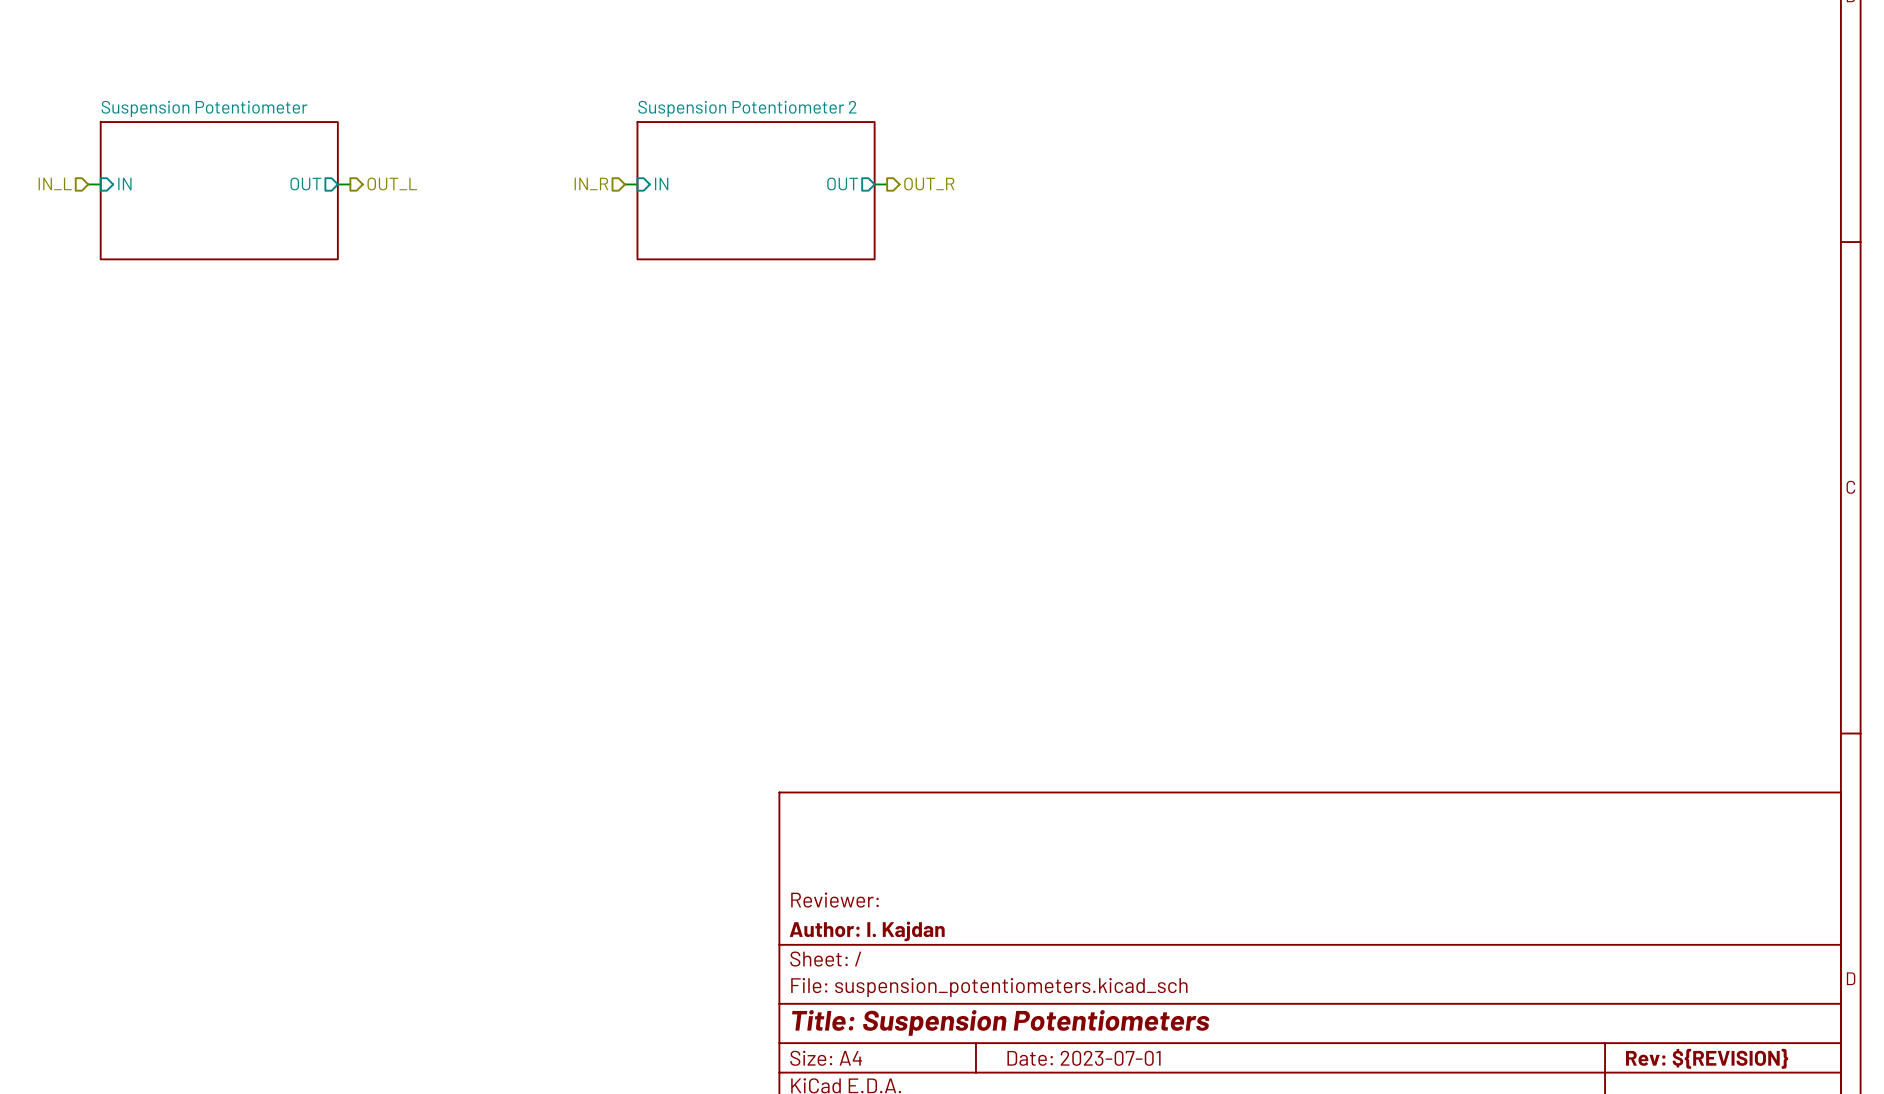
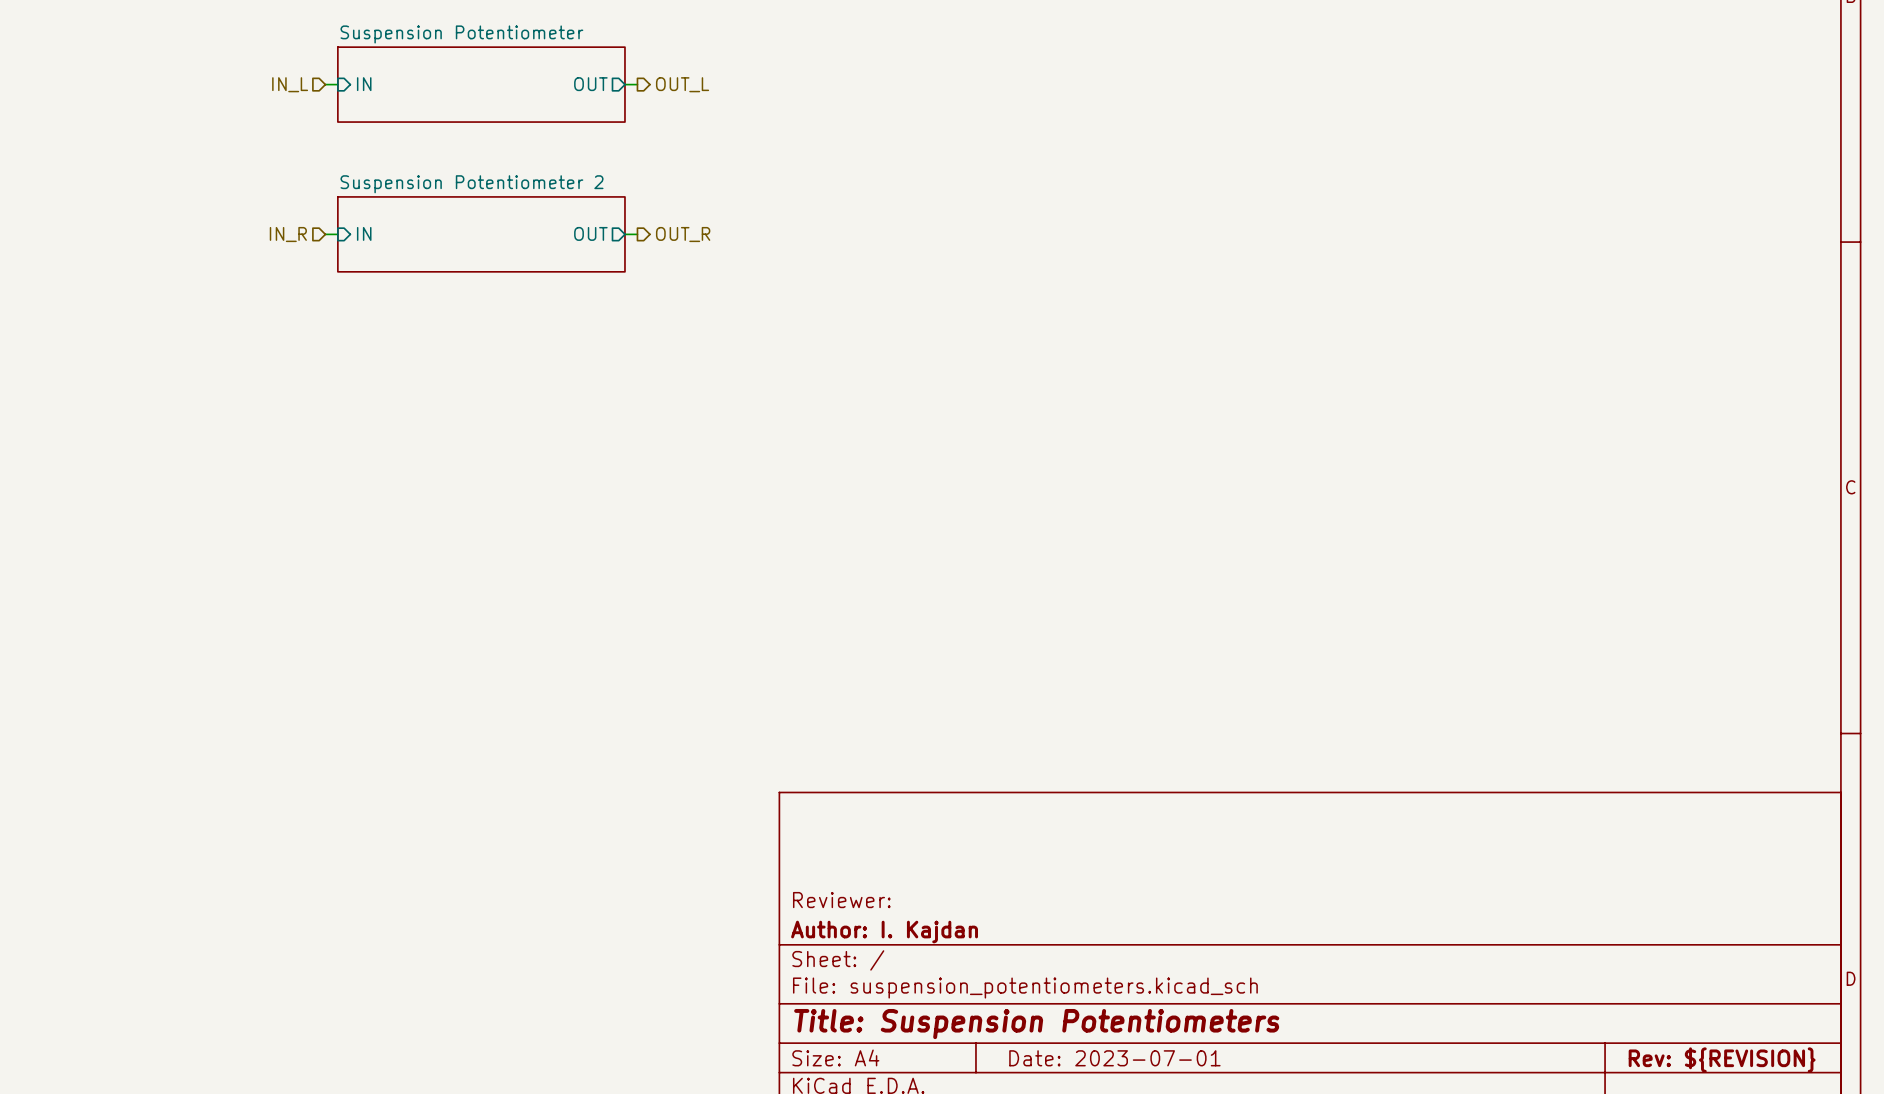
hierarchical label: none -> IN_L (290, 84)
wire: none -> (325, 84) (337, 84)
sheet pin: none -> IN (364, 84)
sheet Suspension Potentiometer: none -> (481, 84)
sheet pin: none -> OUT (590, 84)
wire: none -> (624, 84) (637, 84)
hierarchical label: none -> OUT_L (682, 84)
sheet Suspension Potentiometer 2 name position: Suspension Potentiometer 2 (747, 108) -> Suspension Potentiometer 2 (472, 184)
sheet Suspension Potentiometer 2 shape: [636, 121, 876, 261] -> [337, 196, 626, 273]
hierarchical label: IN_L (55, 183) -> none
sheet pin: IN (124, 183) -> none
sheet pin: OUT (305, 183) -> none
hierarchical label: OUT_L (392, 183) -> none
hierarchical label: IN_R (591, 183) -> none
sheet pin: IN (661, 183) -> none
sheet pin: OUT (842, 183) -> none
hierarchical label: OUT_R (929, 183) -> none
wire: (88, 184) (100, 184) -> none
wire: (337, 184) (350, 184) -> (325, 234) (337, 234)
wire: (624, 184) (637, 184) -> (624, 234) (637, 234)
wire: (874, 184) (887, 184) -> none
sheet Suspension Potentiometer: (219, 190) -> none
hierarchical label: none -> IN_R (288, 234)
sheet pin: none -> IN (364, 233)
sheet pin: none -> OUT (590, 233)
hierarchical label: none -> OUT_R (683, 234)

